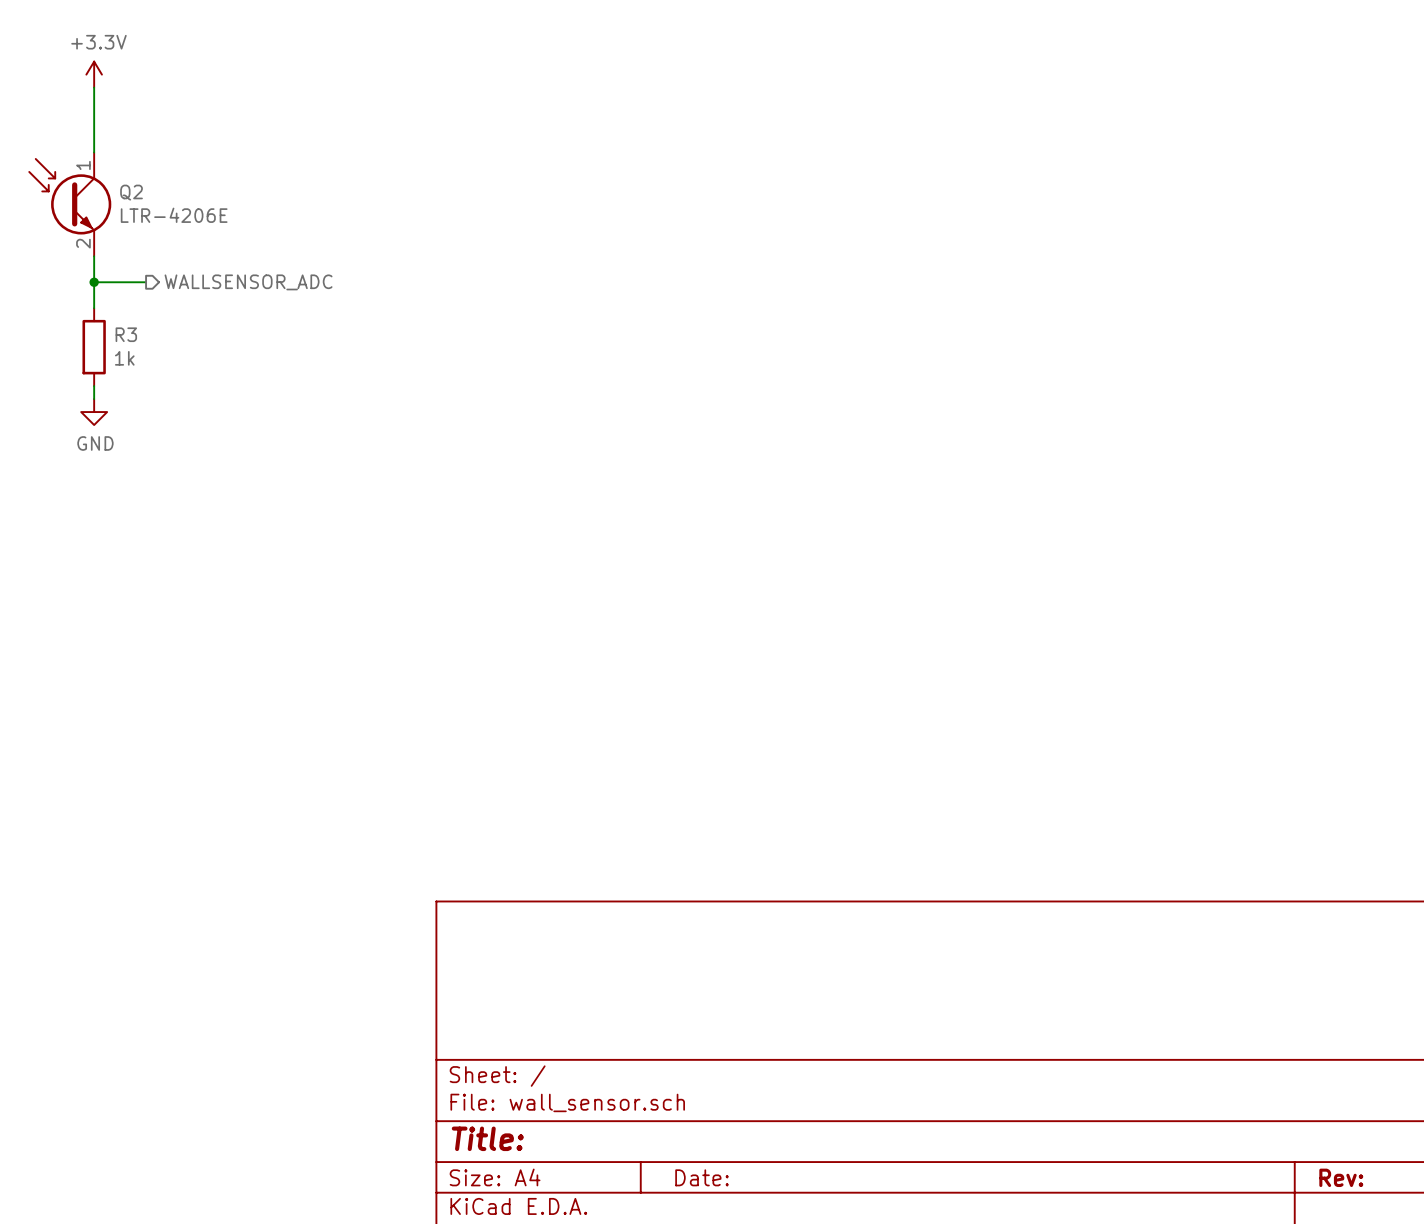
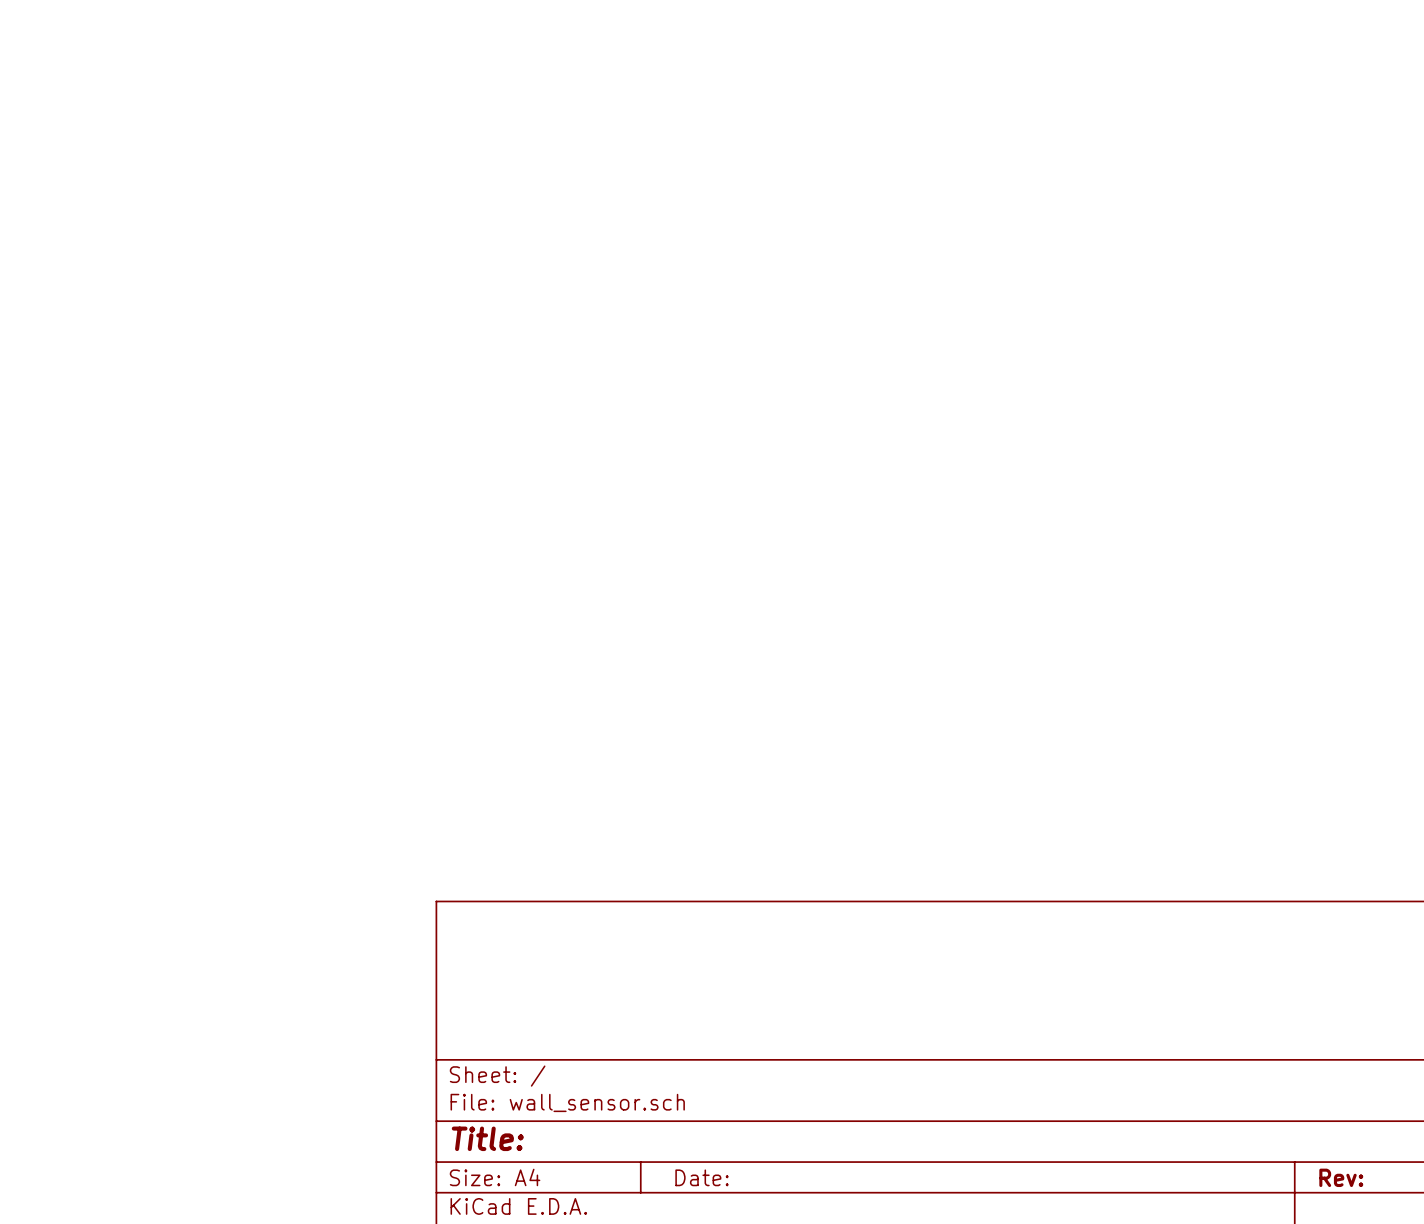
power symbol: +3.3V (94, 74) -> none
wire: (94, 87) (94, 152) -> none
Q2: LTR-4206E (70, 204) -> none
wire: (94, 256) (94, 308) -> none
wire: (94, 282) (146, 282) -> none
junction: (94, 282) -> none
hierarchical label: WALLSENSOR_ADC (248, 282) -> none
R3: 1k (94, 347) -> none
wire: (94, 386) (94, 399) -> none
power symbol: GND (94, 412) -> none

